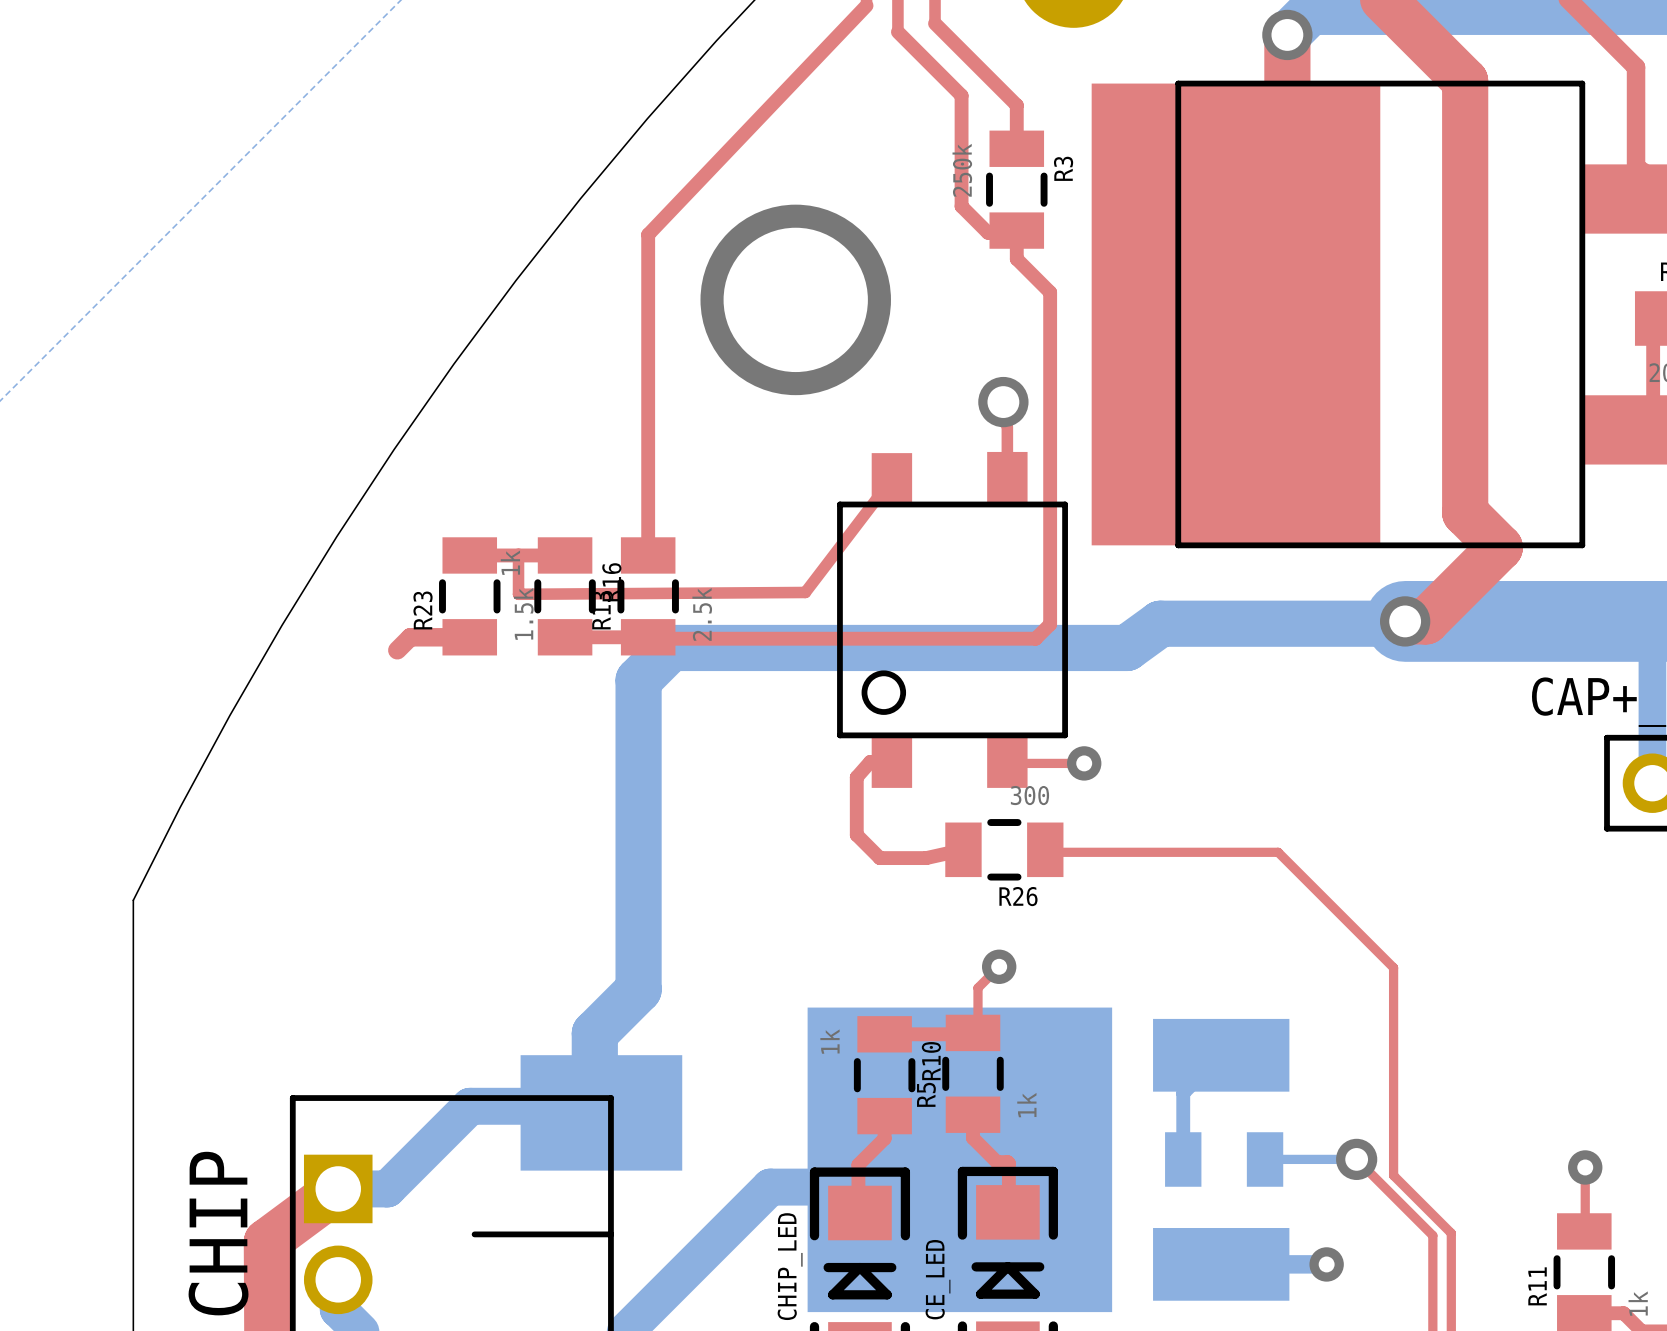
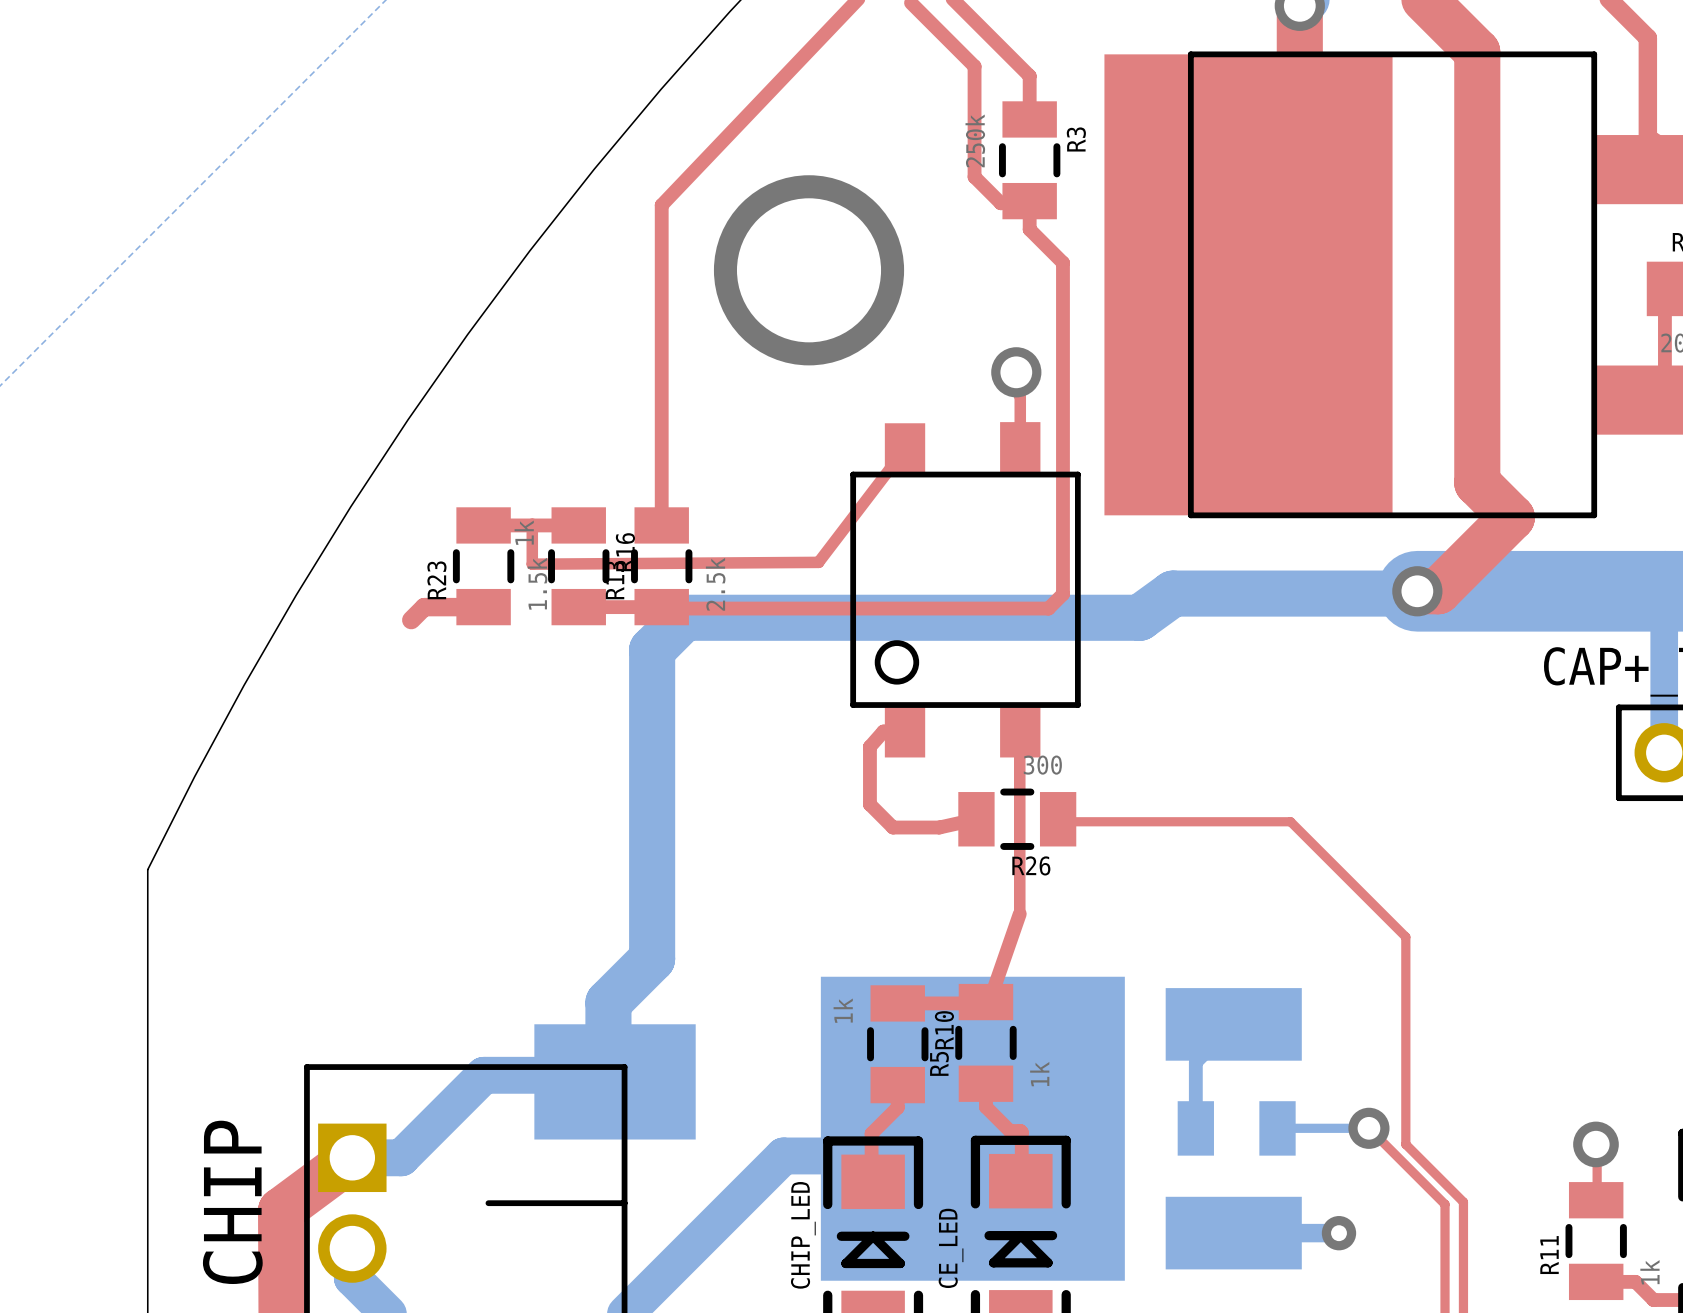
top track: (1006, 762) (1084, 763) -> none
via: (1084, 763) -> none
top track: (999, 966) (977, 987) (977, 1027) -> (1019, 732) (1019, 913) (990, 997)
via: (999, 966) -> none
via size: [1568, 1150, 1603, 1185] -> [1573, 1121, 1619, 1168]

